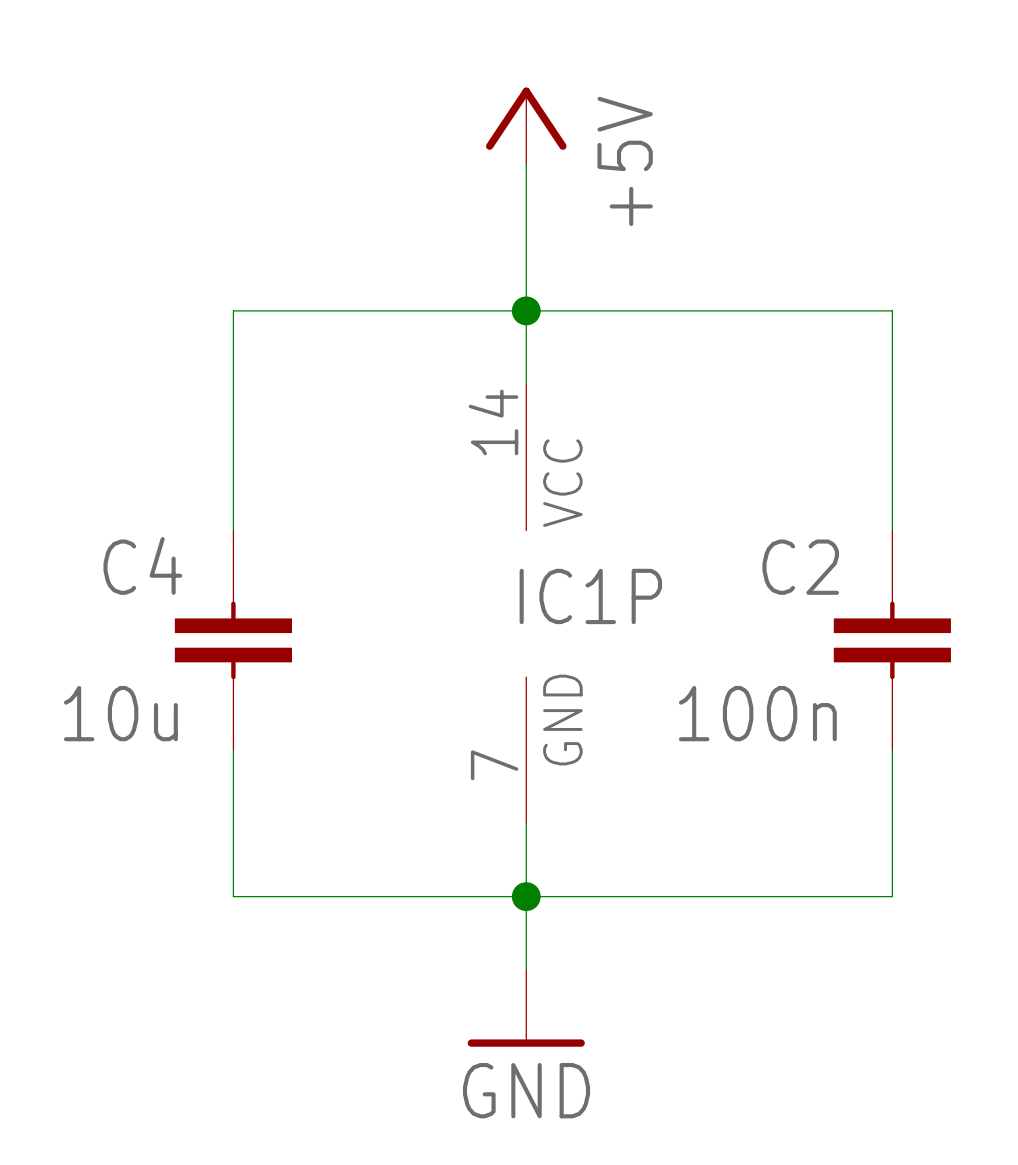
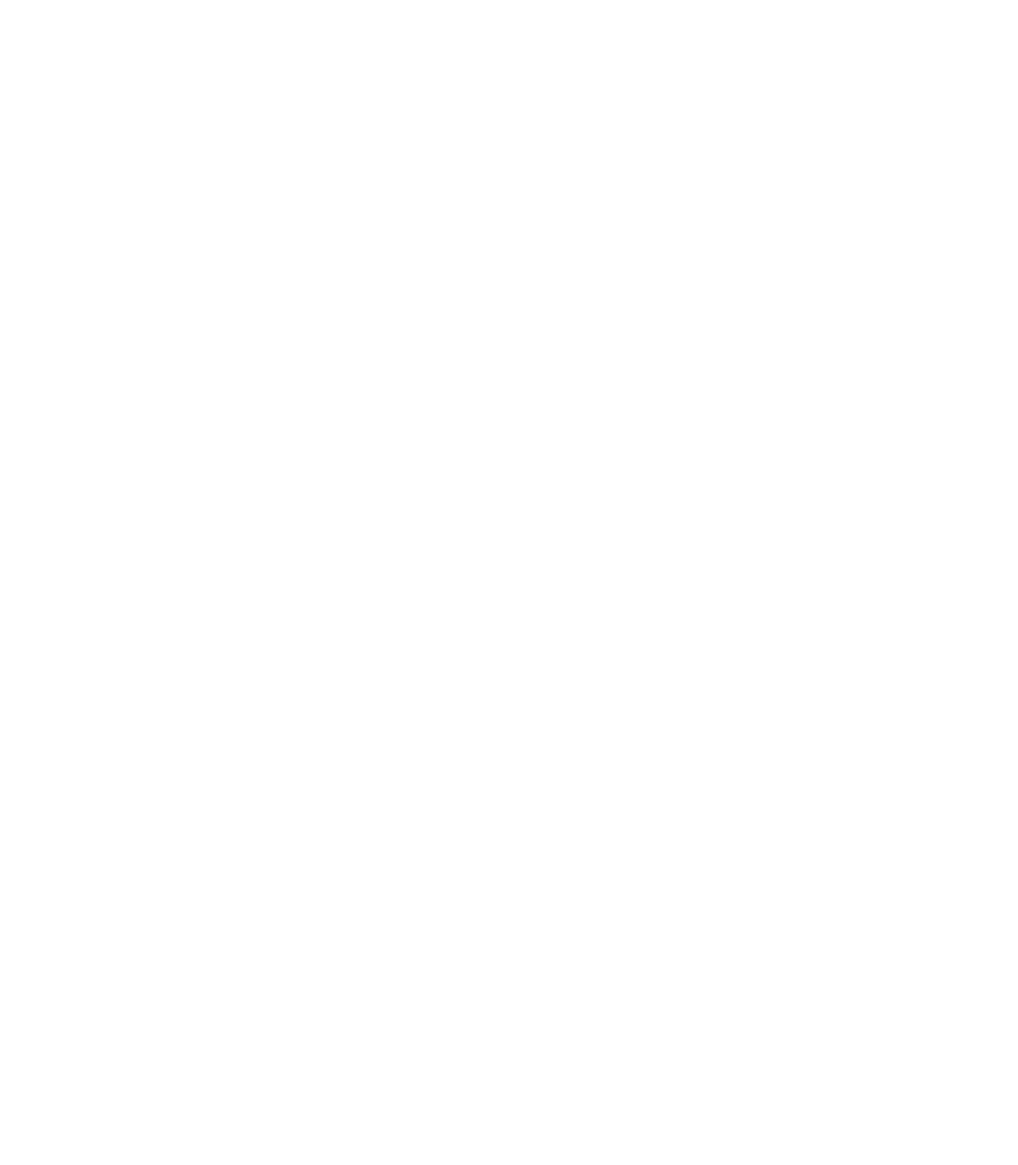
power symbol: +5V (526, 126) -> none
wire: (526, 164) (526, 384) -> none
junction: (526, 310) -> none
wire: (233, 530) (233, 310) (892, 310) (892, 530) -> none
IC1P: (526, 603) -> none
C4: 10u (233, 640) -> none
C2: 100n (892, 640) -> none
wire: (233, 750) (233, 896) (892, 896) (892, 750) -> none
wire: (526, 823) (526, 969) -> none
junction: (526, 896) -> none
power symbol: GND (526, 1008) -> none

